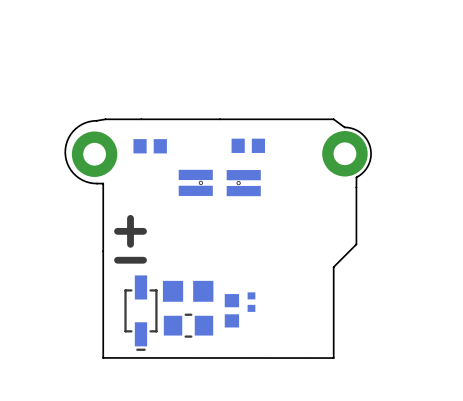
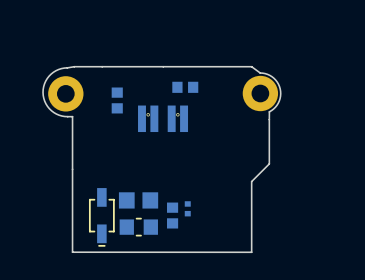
part rotation: 0° (150, 146) -> 90° clockwise (117, 100)
part rotation: 0° (195, 182) -> 90° counterclockwise (148, 118)
part rotation: 0° (243, 183) -> 90° clockwise (177, 118)
text: + (130, 231) -> none
text: - (130, 260) -> none

